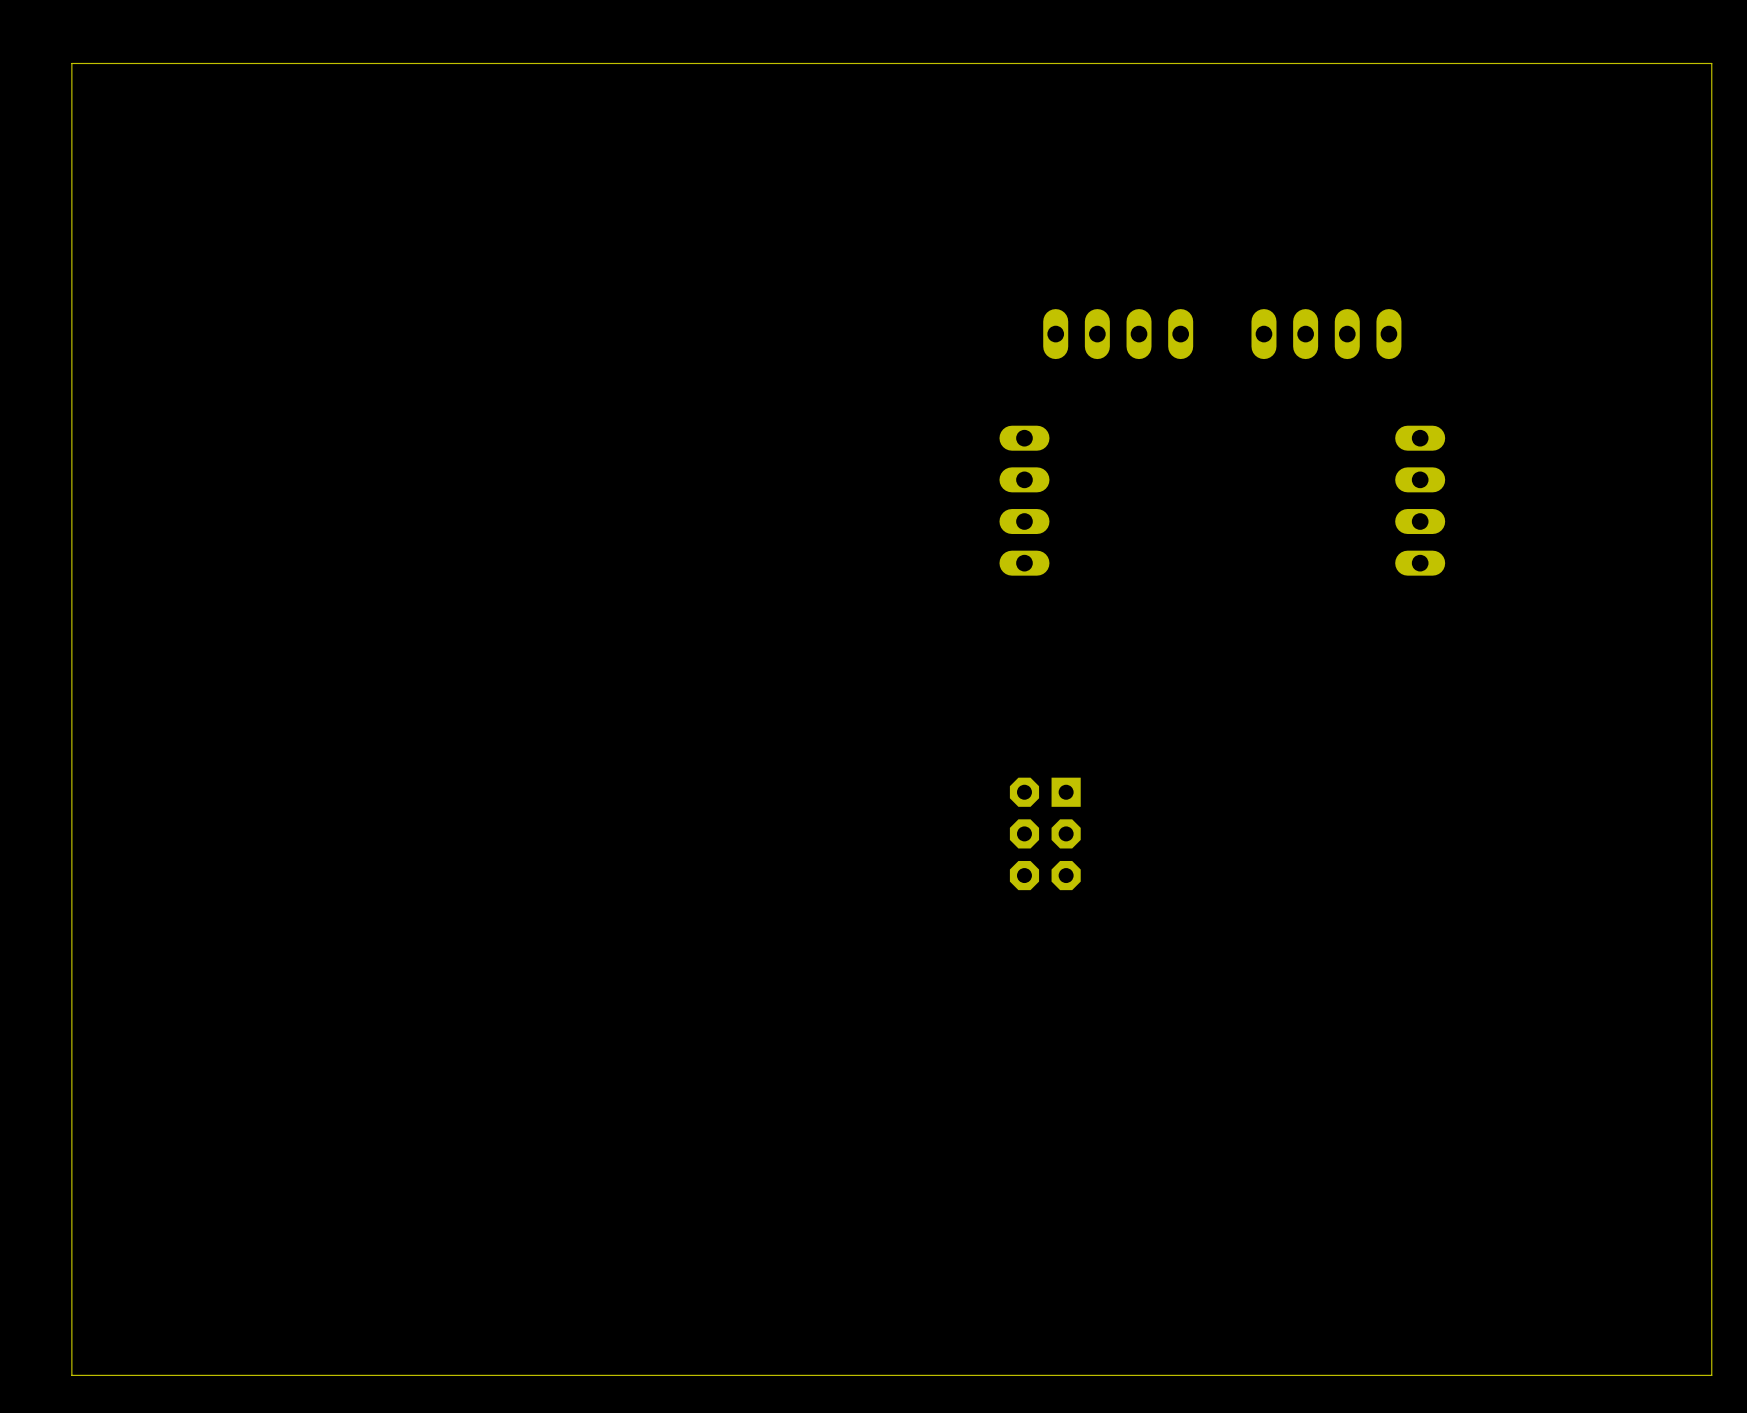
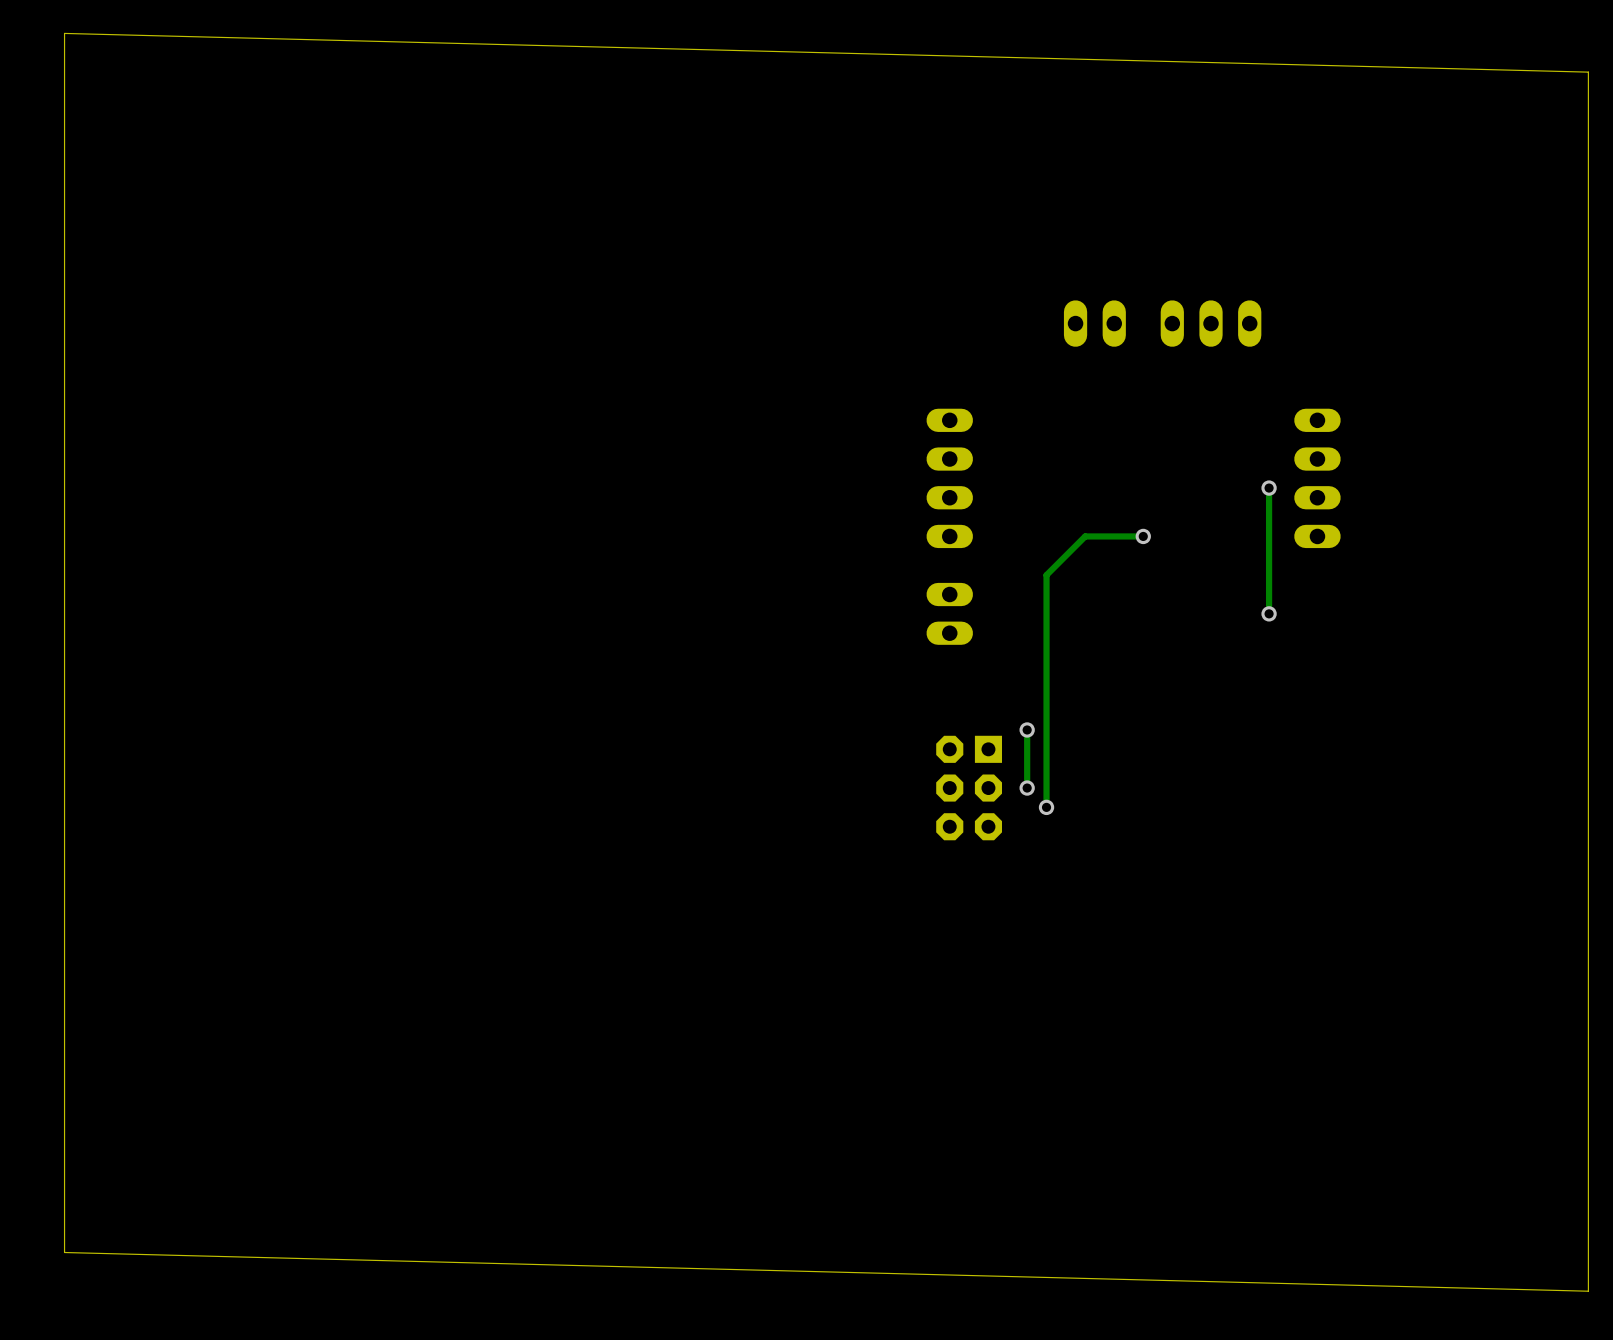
board edge: (1711, 63) (71, 63) -> (1588, 72) (64, 33) (64, 72)
part: (1118, 334) -> none
part: none -> (1094, 323)
part: (1326, 334) -> none
track: none -> (1269, 488) (1269, 613)
via: none -> (1269, 488)
track: none -> (1143, 536) (1085, 536) (1046, 575) (1046, 807)
via: none -> (1143, 536)
part: none -> (949, 613)
via: none -> (1269, 613)
track: none -> (1027, 729) (1027, 788)
via: none -> (1027, 729)
via: none -> (1027, 788)
via: none -> (1046, 807)
board edge: (71, 1333) (71, 1375) (1711, 1375) -> (64, 1252) (1588, 1291)

